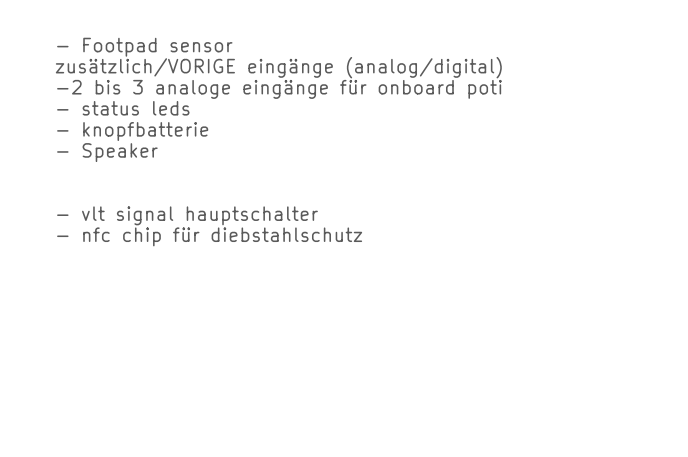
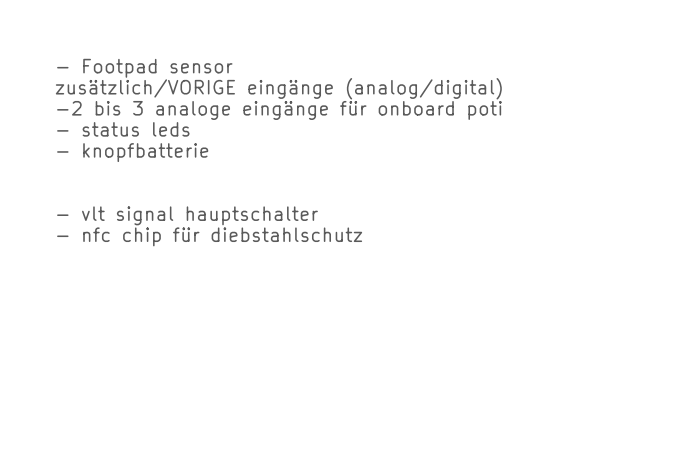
text: - Footpad sensor (144, 47) -> none
text: zusätzlich/VORIGE eingänge (analog/digital) (278, 67) -> - Footpad sensor (144, 68)
text: -2 bis 3 analoge eingänge für onboard poti (279, 89) -> zusätzlich/VORIGE eingänge (analog/digital) (278, 88)
text: - status leds (123, 108) -> -2 bis 3 analoge eingänge für onboard poti (279, 110)
text: - knopfbatterie (132, 131) -> - status leds (123, 129)
text: - Speaker (107, 152) -> - knopfbatterie (132, 152)

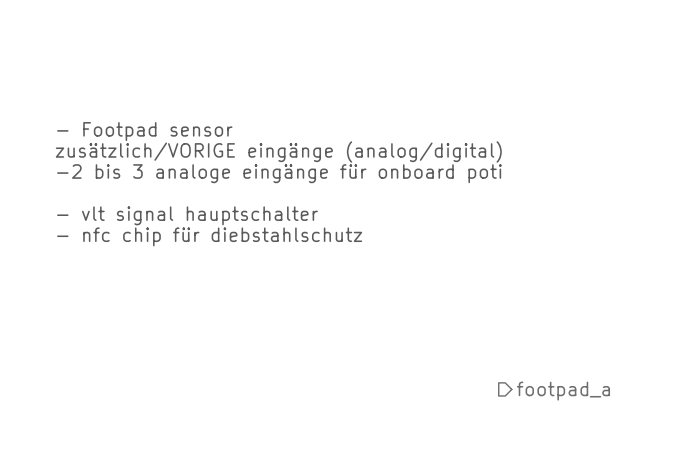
text: - Footpad sensor (144, 68) -> none
text: zusätzlich/VORIGE eingänge (analog/digital) (278, 88) -> none
text position: -2 bis 3 analoge eingänge für onboard poti (279, 110) -> -2 bis 3 analoge eingänge für onboard poti (279, 173)
text: - status leds (123, 129) -> - Footpad sensor (144, 131)
text: - knopfbatterie (132, 152) -> zusätzlich/VORIGE eingänge (analog/digital) (278, 151)
hierarchical label: none -> footpad_a (563, 391)

